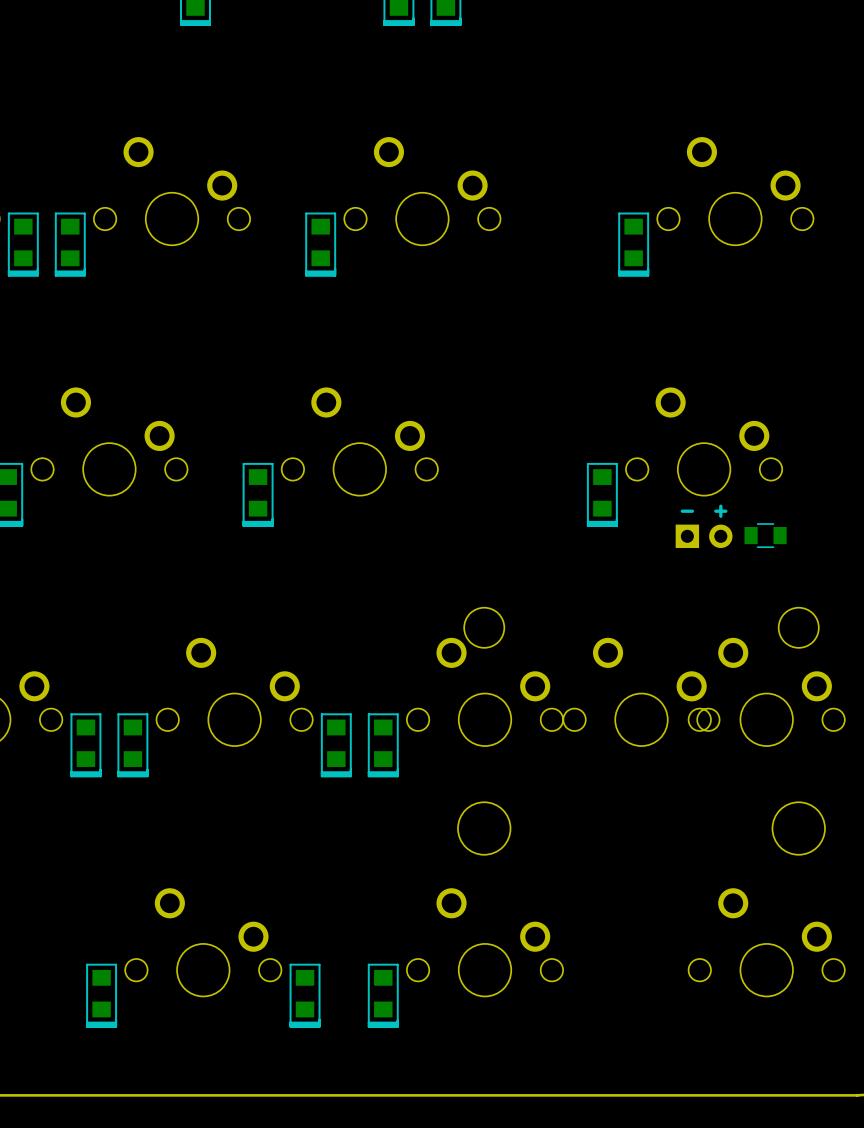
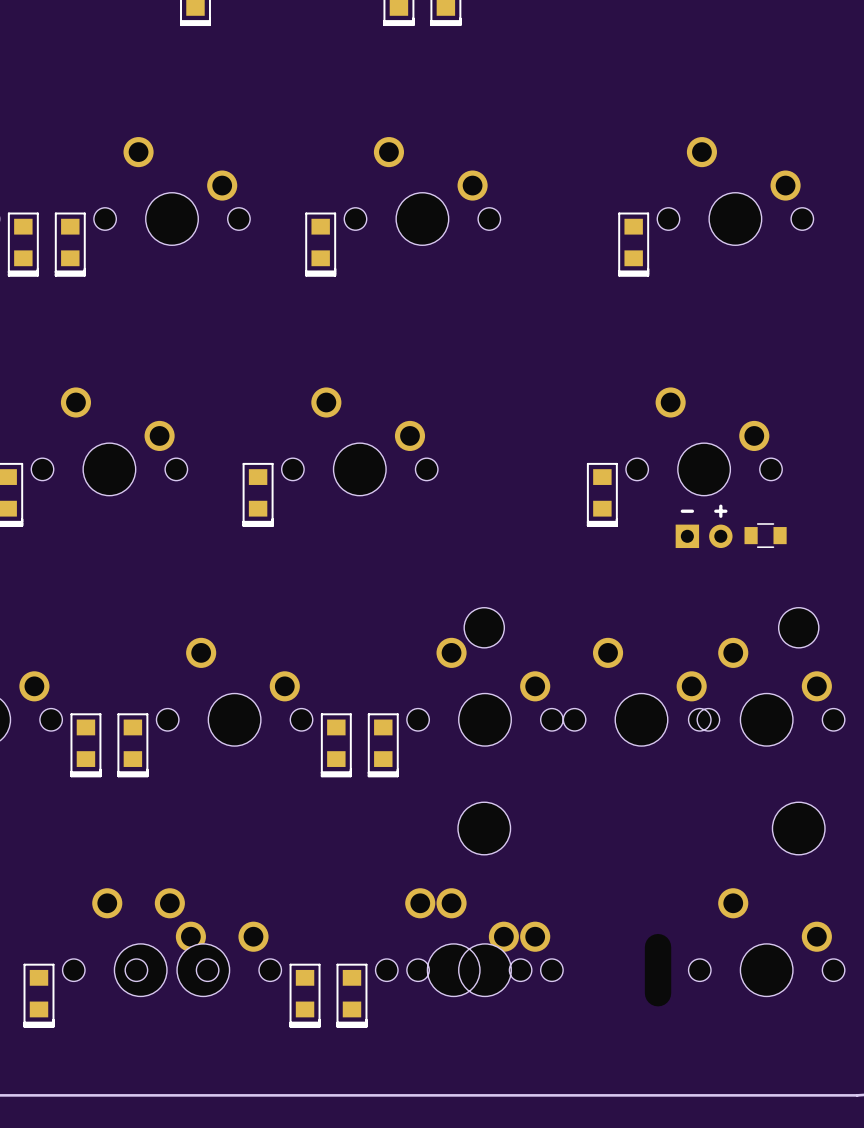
part: none -> (140, 942)
part: none -> (453, 942)
part position: (101, 995) -> (38, 995)
part position: (383, 995) -> (351, 995)

